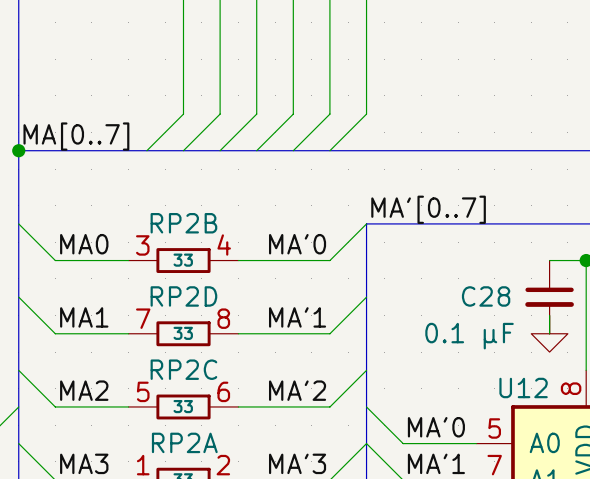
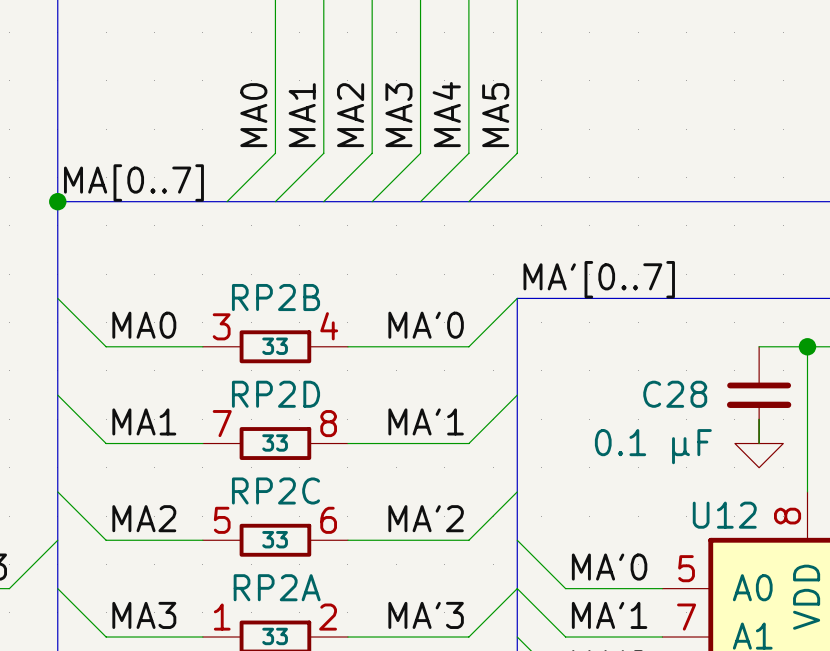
label: none -> MA4 (446, 114)
label: none -> MA0 (253, 115)
label: none -> MA1 (302, 115)
label: none -> MA2 (350, 115)
label: none -> MA3 (398, 115)
label: none -> MA5 (495, 115)

